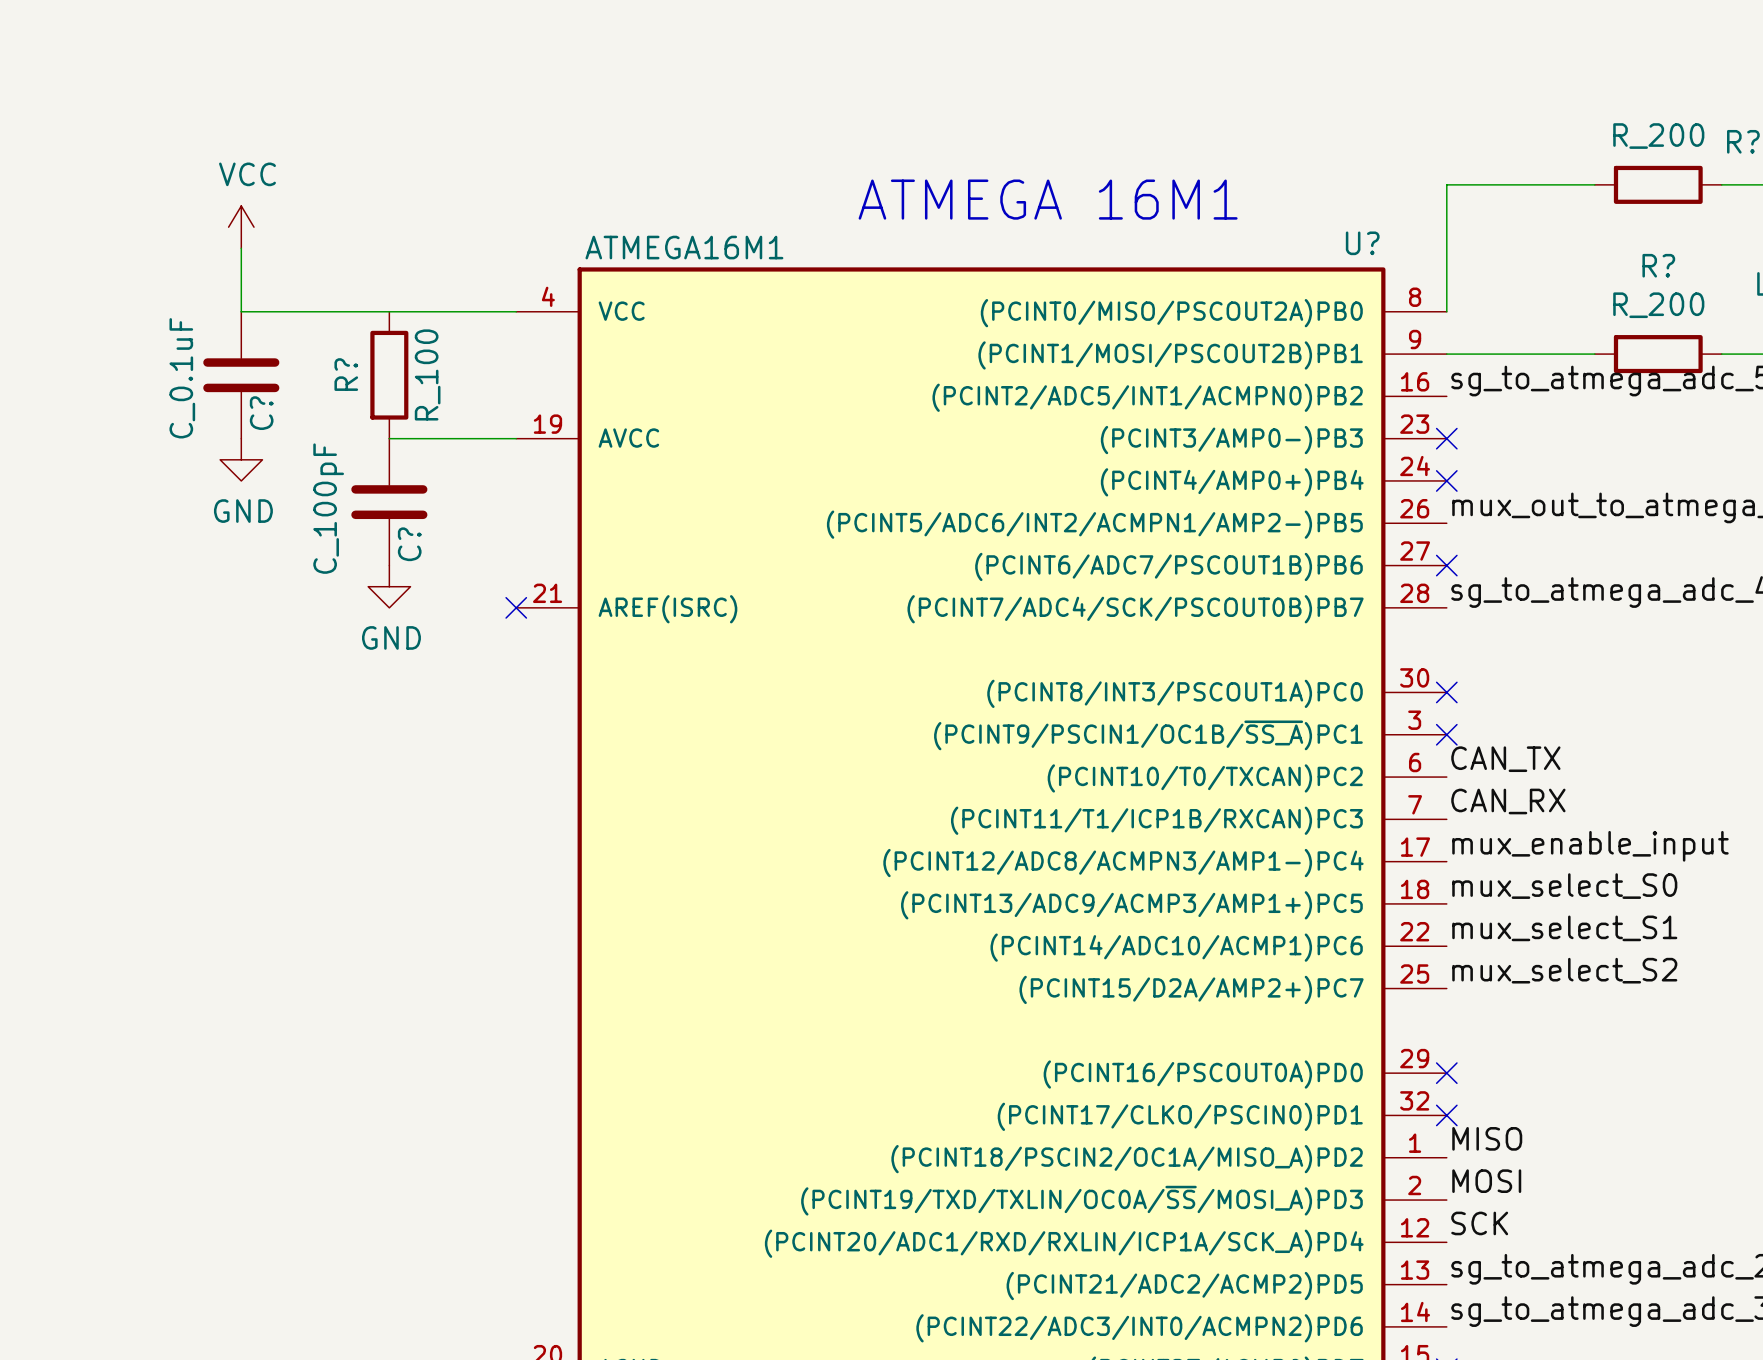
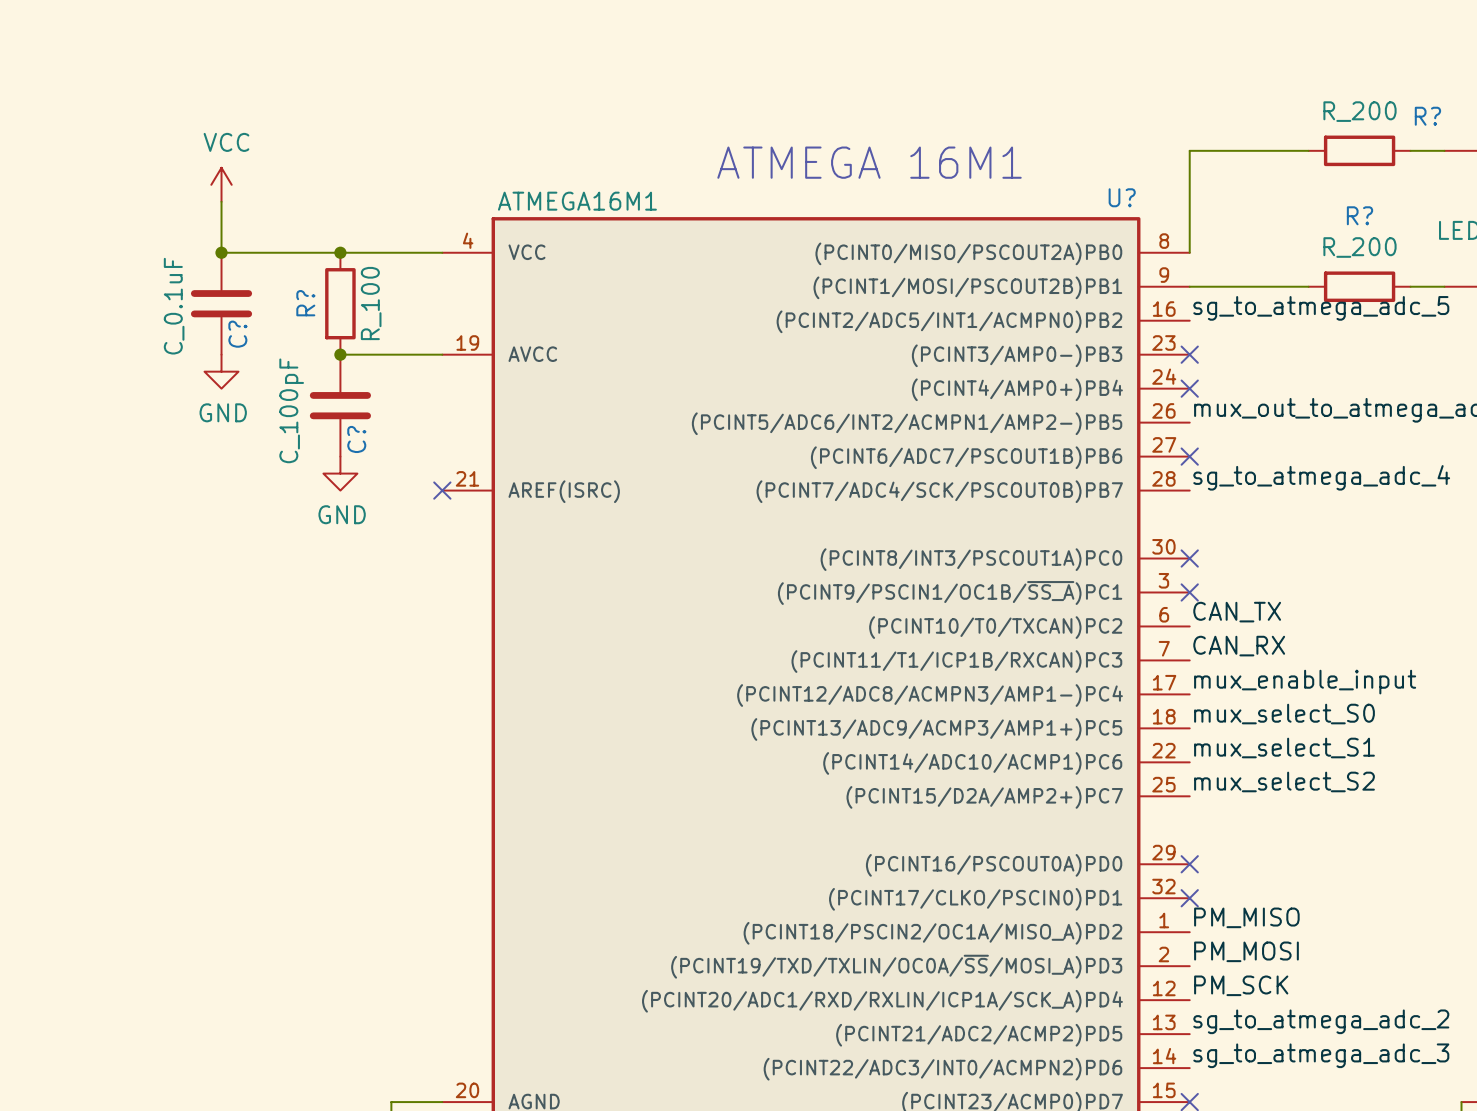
junction: none -> (221, 252)
junction: none -> (340, 252)
junction: none -> (340, 354)
label: MISO (1487, 1138) -> PM_MISO (1246, 917)
label: MOSI (1486, 1181) -> PM_MOSI (1246, 951)
label: SCK (1479, 1223) -> PM_SCK (1241, 985)

